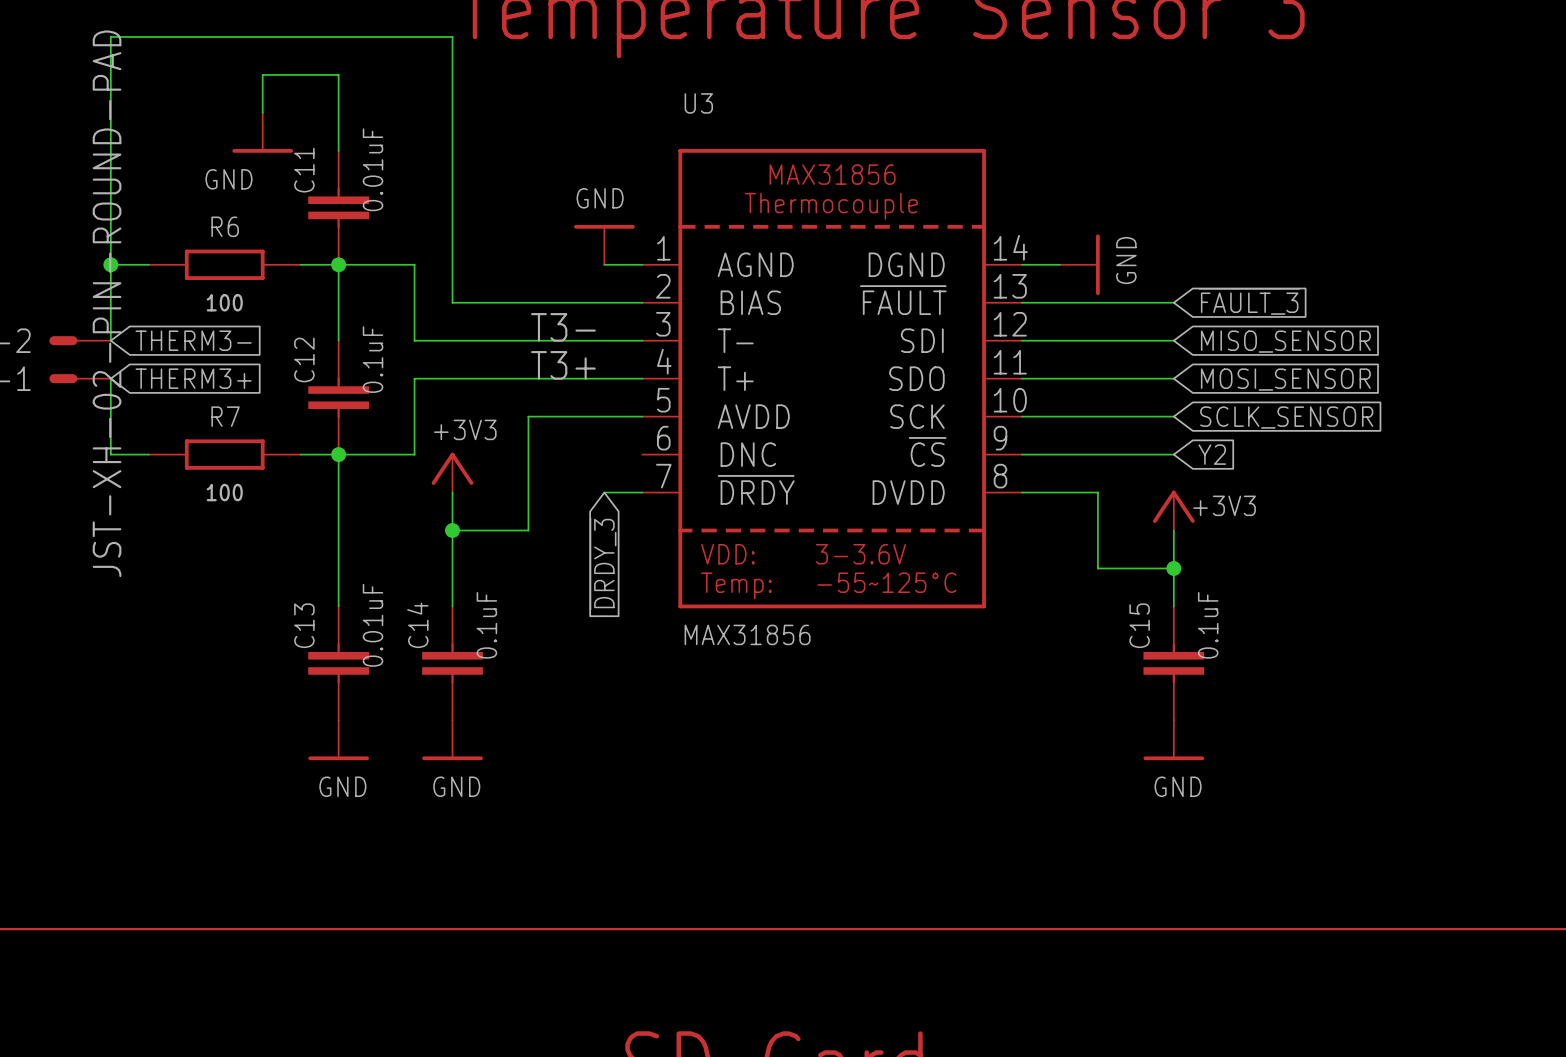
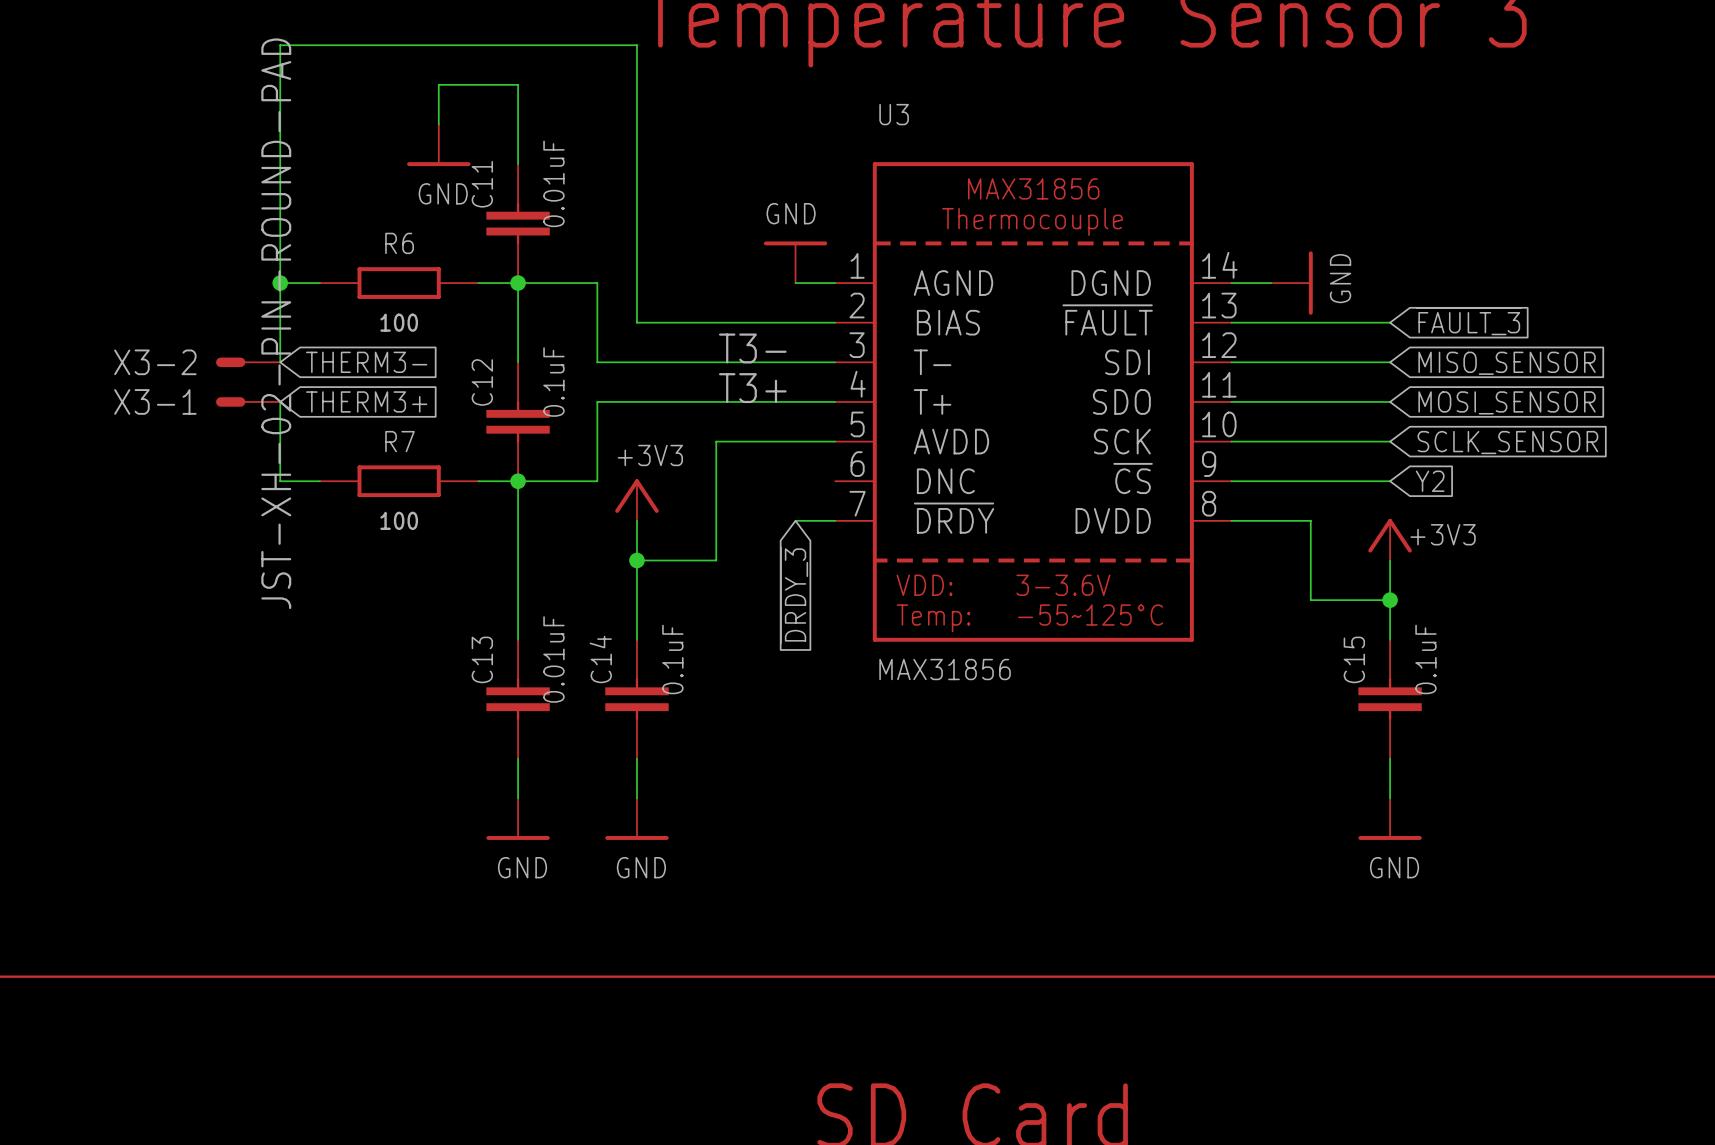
power symbol text position: GND (228, 179) -> GND (443, 193)
power symbol position: GND (338, 740) -> GND (518, 819)
power symbol position: GND (452, 740) -> GND (636, 819)
power symbol position: GND (1173, 740) -> GND (1390, 819)

